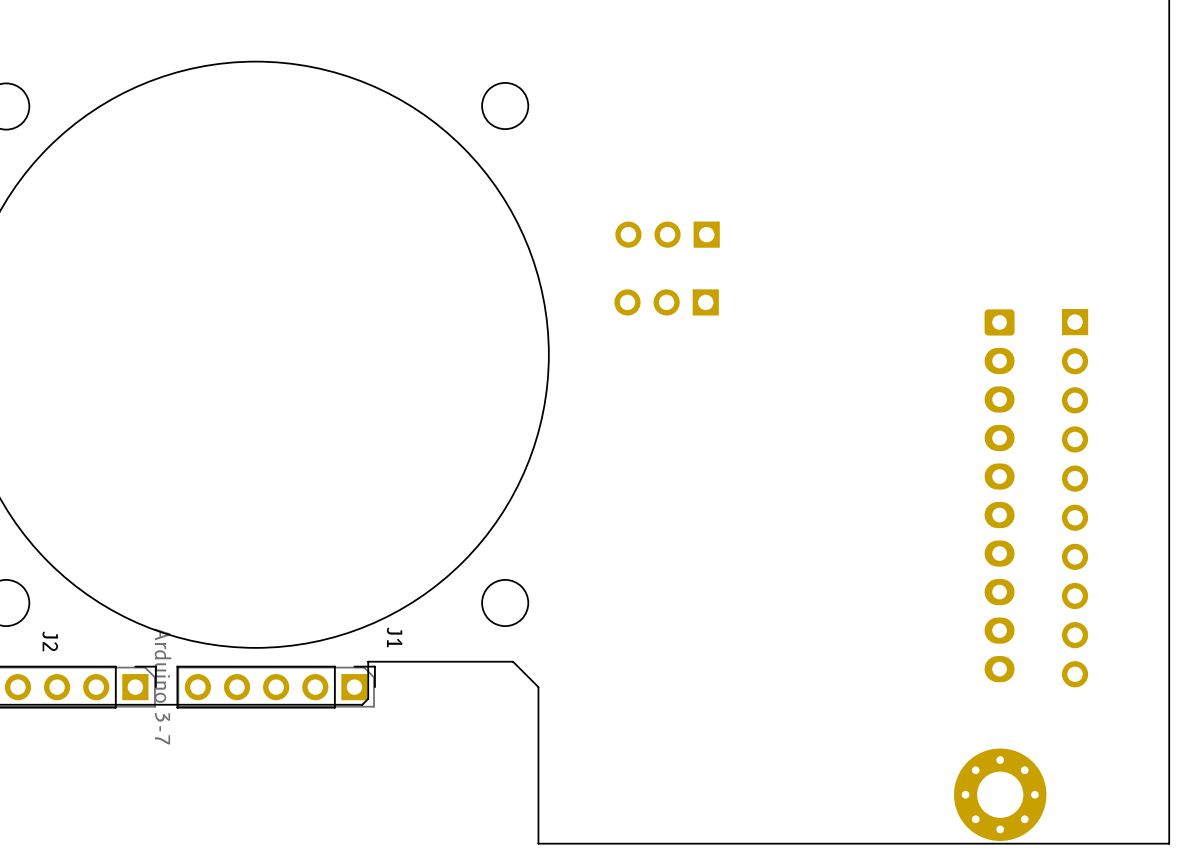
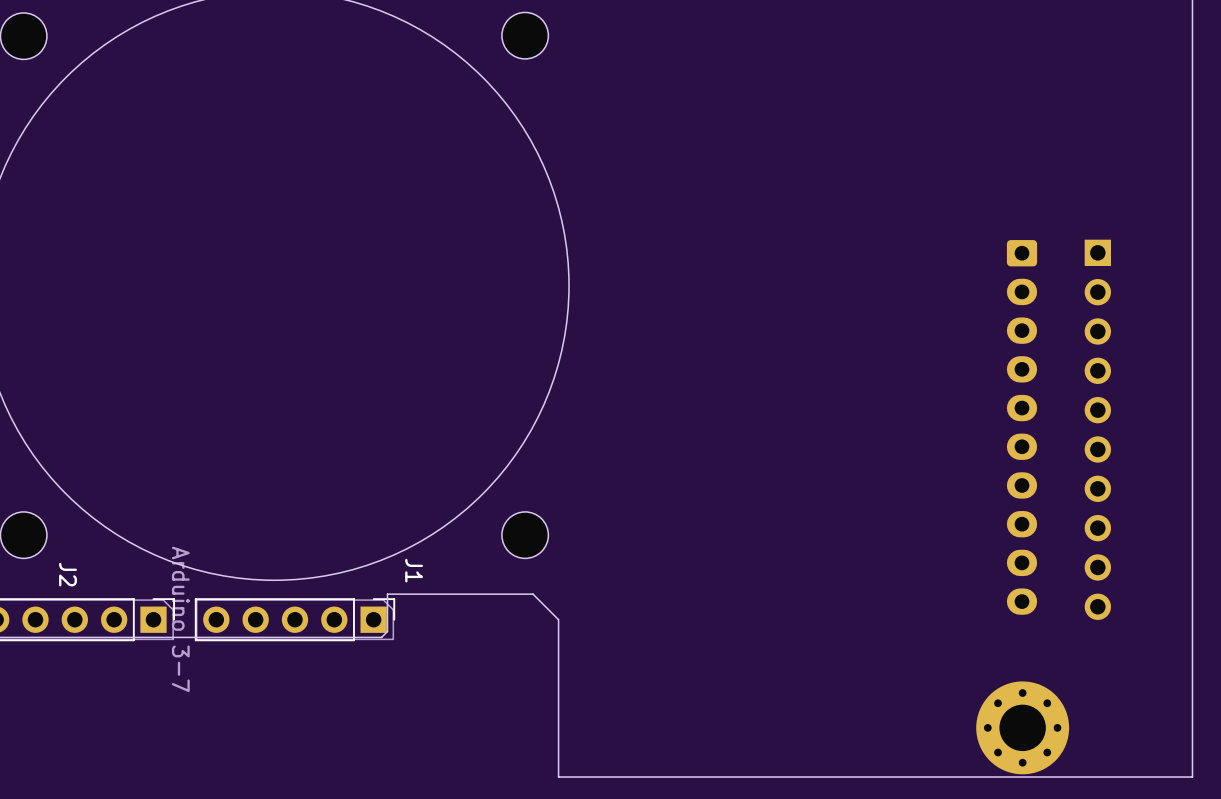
part: (667, 234) -> none
part: (666, 302) -> none

